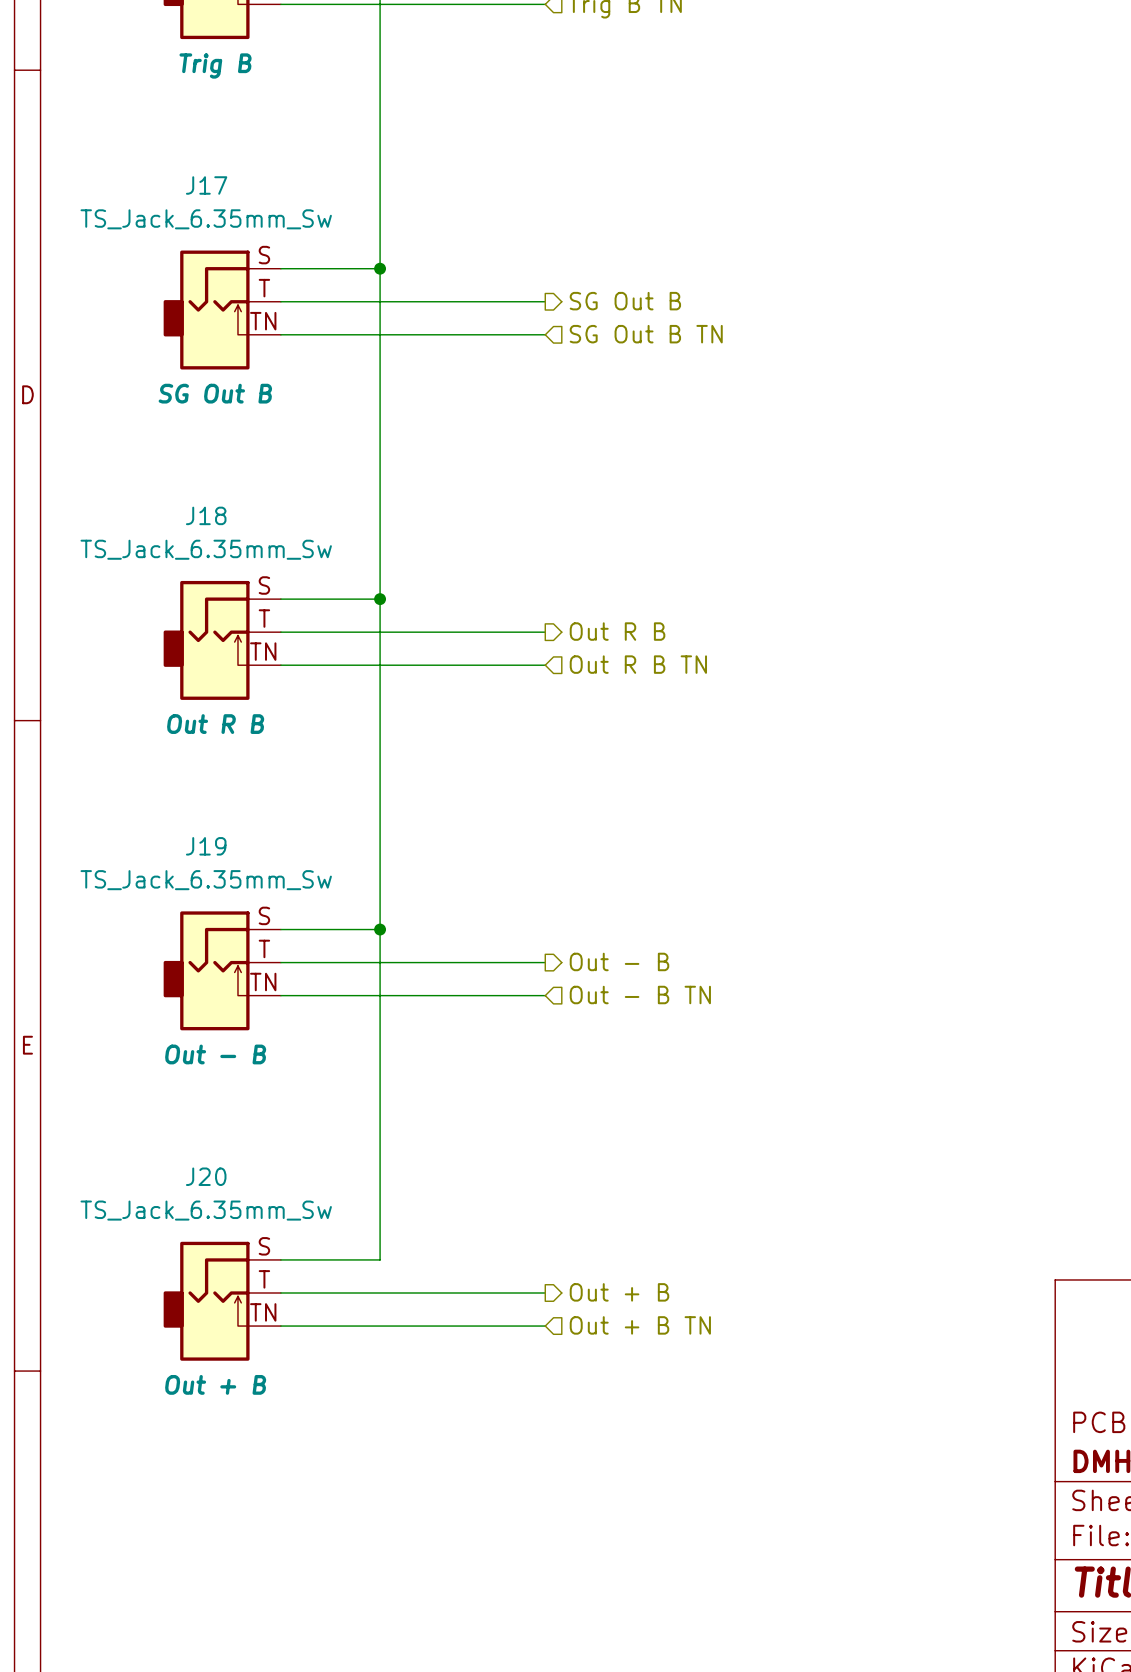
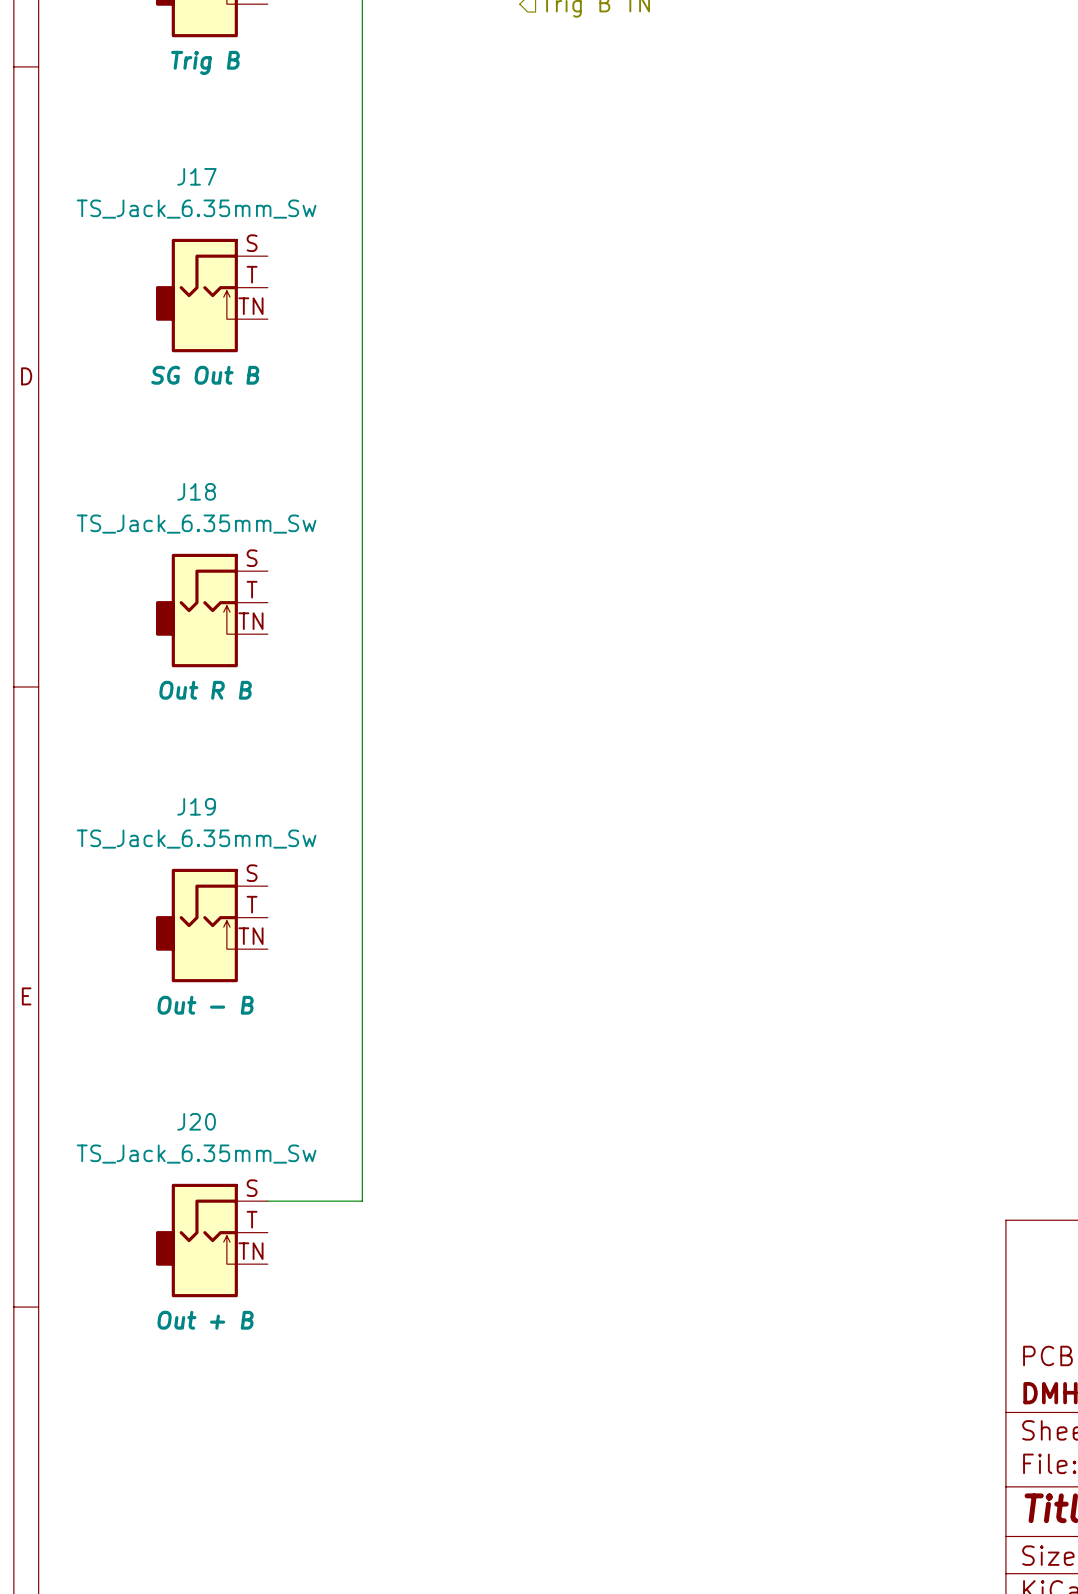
wire: (280, 4) (545, 4) -> none
wire: (280, 268) (380, 268) -> none
junction: (380, 268) -> none
wire: (280, 301) (545, 301) -> none
hierarchical label: SG Out B (625, 301) -> none
wire: (280, 334) (545, 334) -> none
hierarchical label: SG Out B TN (646, 334) -> none
wire: (280, 599) (380, 599) -> none
junction: (380, 599) -> none
hierarchical label: Out R B (617, 631) -> none
wire: (280, 632) (545, 632) -> none
hierarchical label: Out R B TN (638, 664) -> none
wire: (280, 665) (545, 665) -> none
wire: (280, 929) (380, 929) -> none
junction: (380, 929) -> none
hierarchical label: Out - B (619, 961) -> none
wire: (280, 962) (545, 962) -> none
wire: (280, 995) (545, 995) -> none
hierarchical label: Out - B TN (640, 995) -> none
wire: (280, 1292) (545, 1292) -> none
hierarchical label: Out + B (619, 1292) -> none
hierarchical label: Out + B TN (640, 1325) -> none
wire: (280, 1326) (545, 1326) -> none

